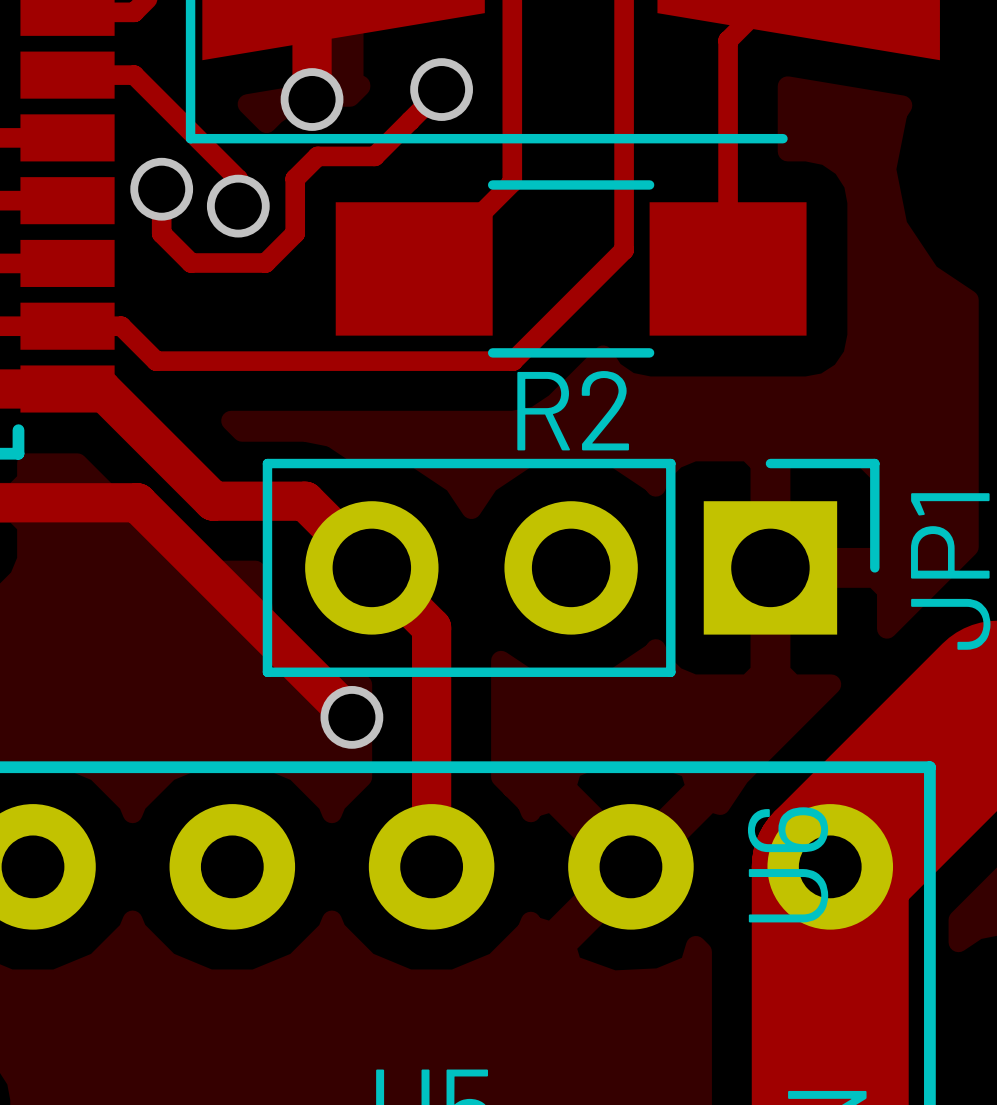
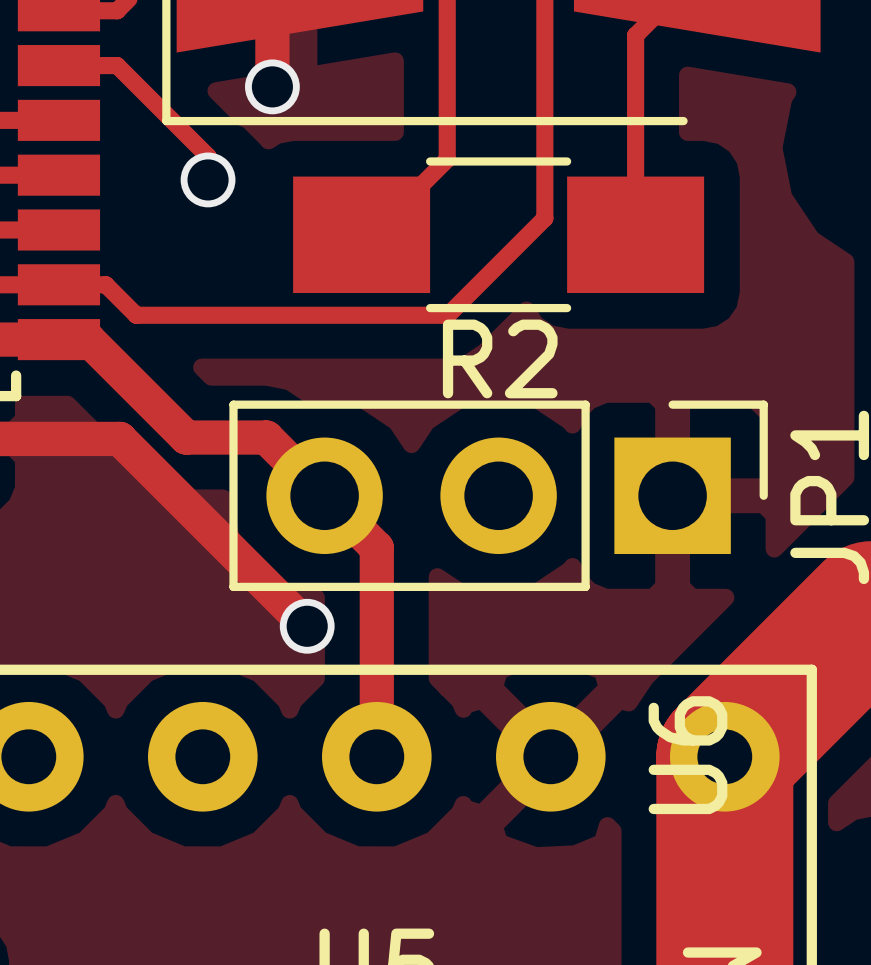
track: (441, 89) (374, 156) (317, 156) (295, 178) (295, 233) (265, 263) (191, 263) (161, 233) (161, 189) -> none
via: (441, 89) -> none
via: (161, 189) -> none

